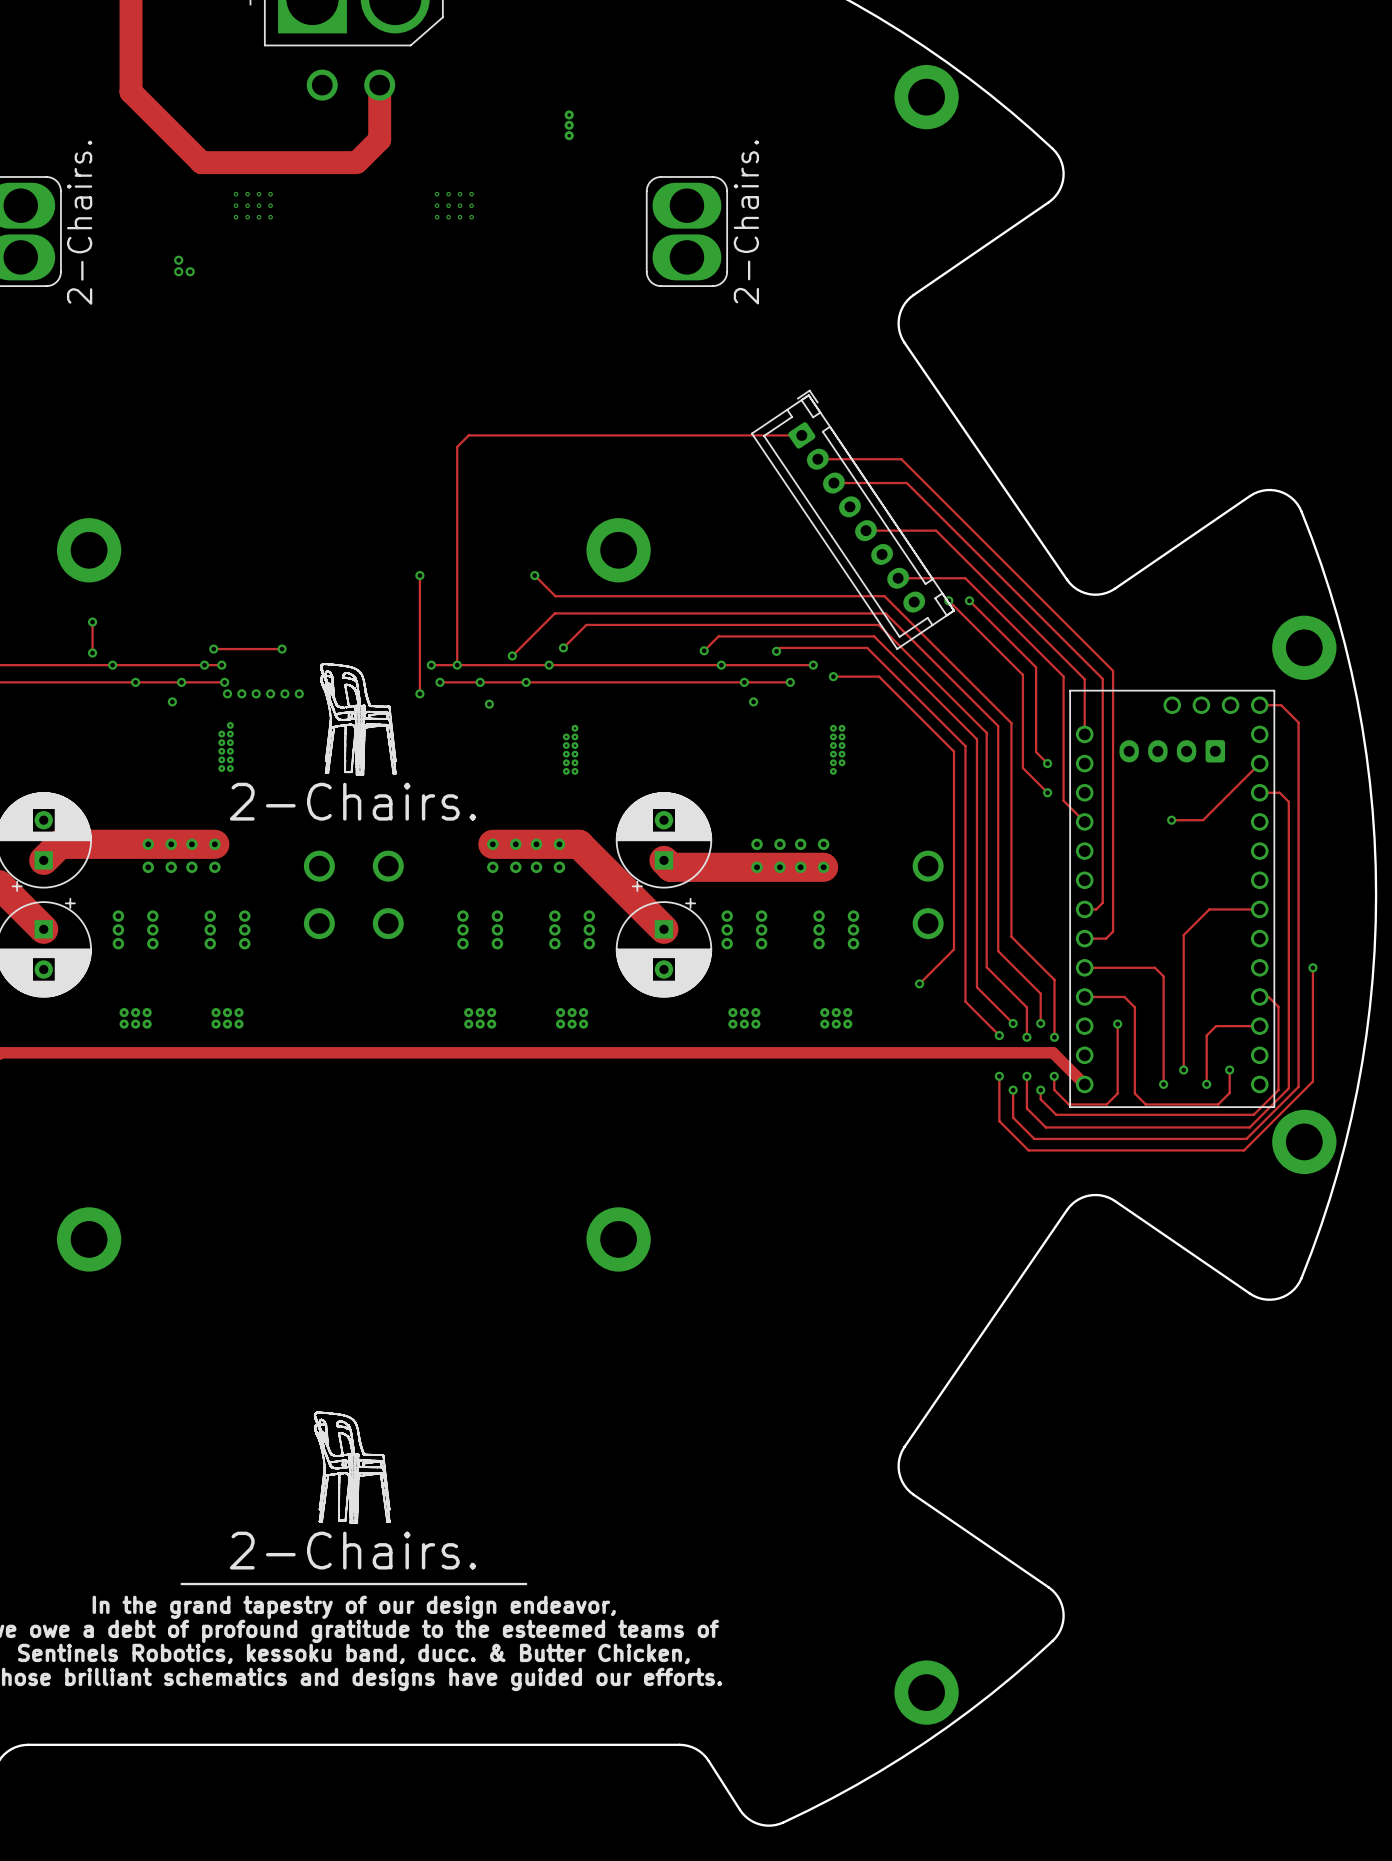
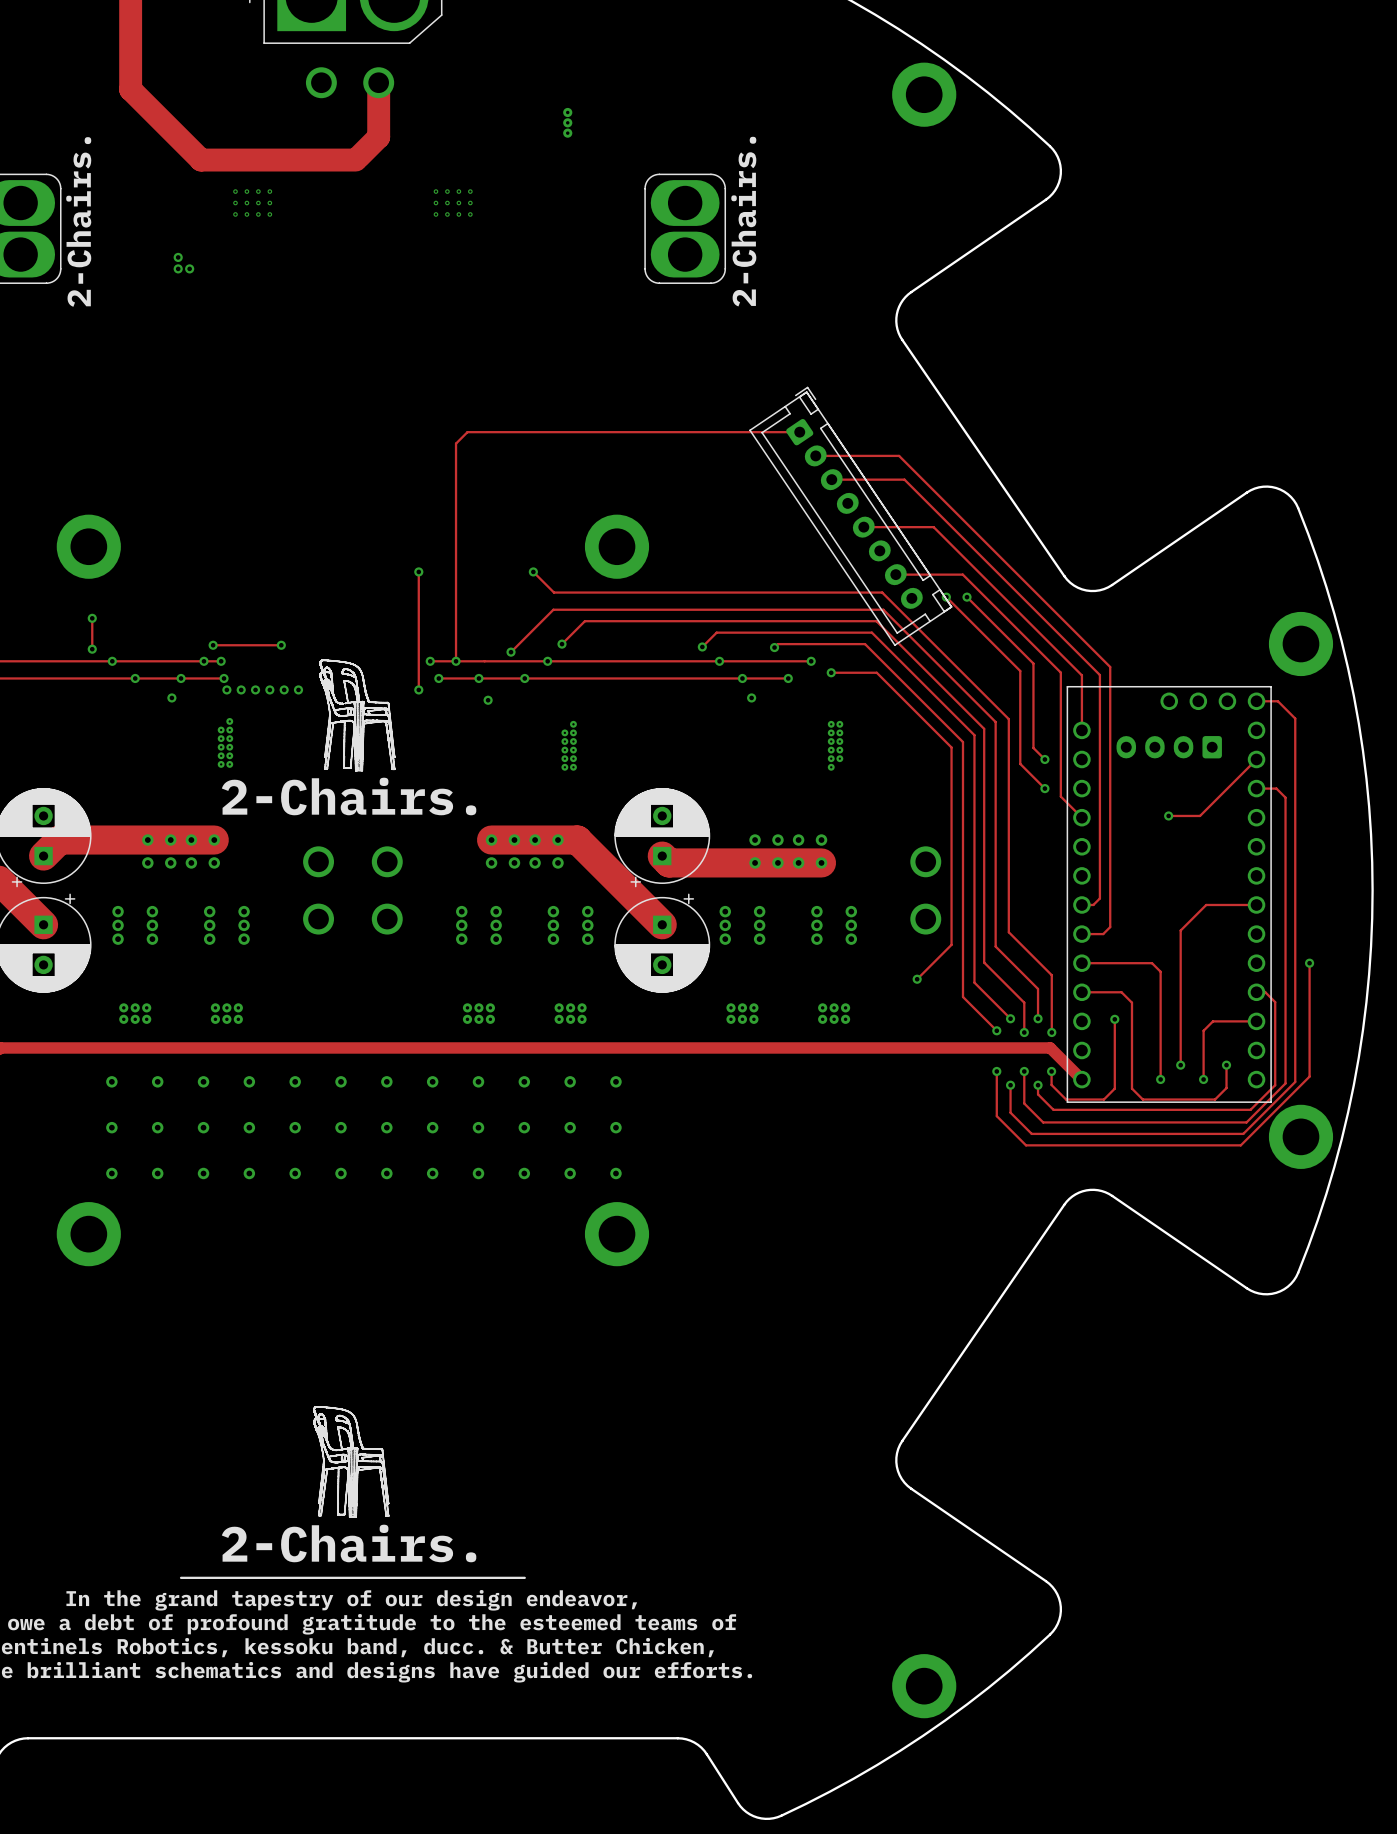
via: none -> (111, 1081)
via: none -> (157, 1081)
via: none -> (203, 1081)
via: none -> (249, 1081)
via: none -> (295, 1081)
via: none -> (341, 1081)
via: none -> (386, 1081)
via: none -> (432, 1081)
via: none -> (478, 1081)
via: none -> (524, 1081)
via: none -> (570, 1081)
via: none -> (615, 1081)
via: none -> (111, 1127)
via: none -> (157, 1127)
via: none -> (203, 1127)
via: none -> (249, 1127)
via: none -> (295, 1127)
via: none -> (341, 1127)
via: none -> (386, 1127)
via: none -> (432, 1127)
via: none -> (478, 1127)
via: none -> (524, 1127)
via: none -> (570, 1127)
via: none -> (615, 1127)
via: none -> (111, 1173)
via: none -> (157, 1173)
via: none -> (203, 1173)
via: none -> (249, 1173)
via: none -> (295, 1173)
via: none -> (341, 1173)
via: none -> (386, 1173)
via: none -> (432, 1173)
via: none -> (478, 1173)
via: none -> (524, 1173)
via: none -> (570, 1173)
via: none -> (615, 1173)

